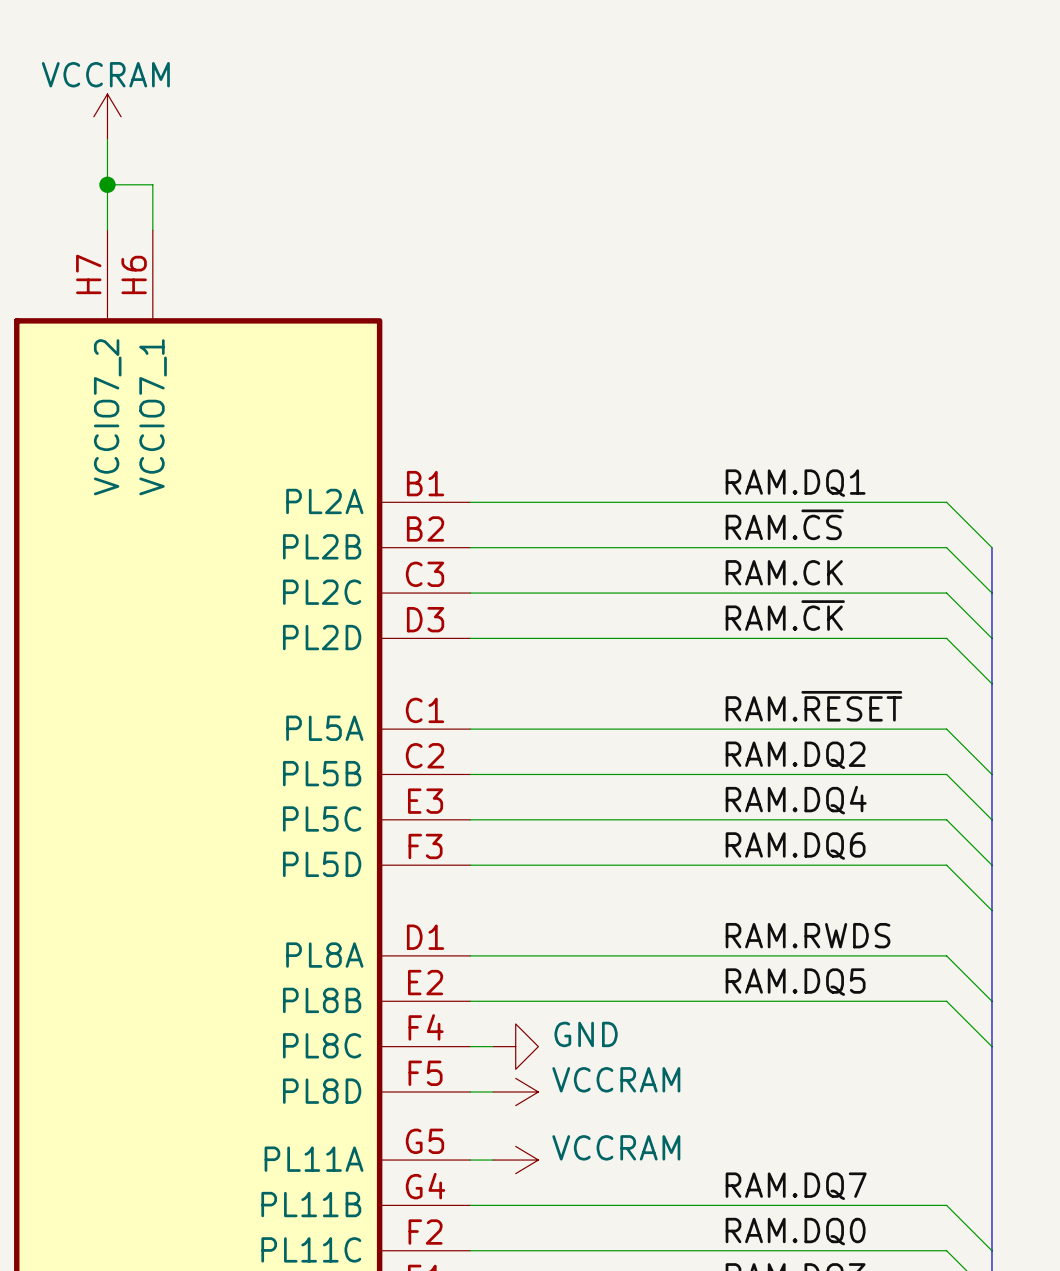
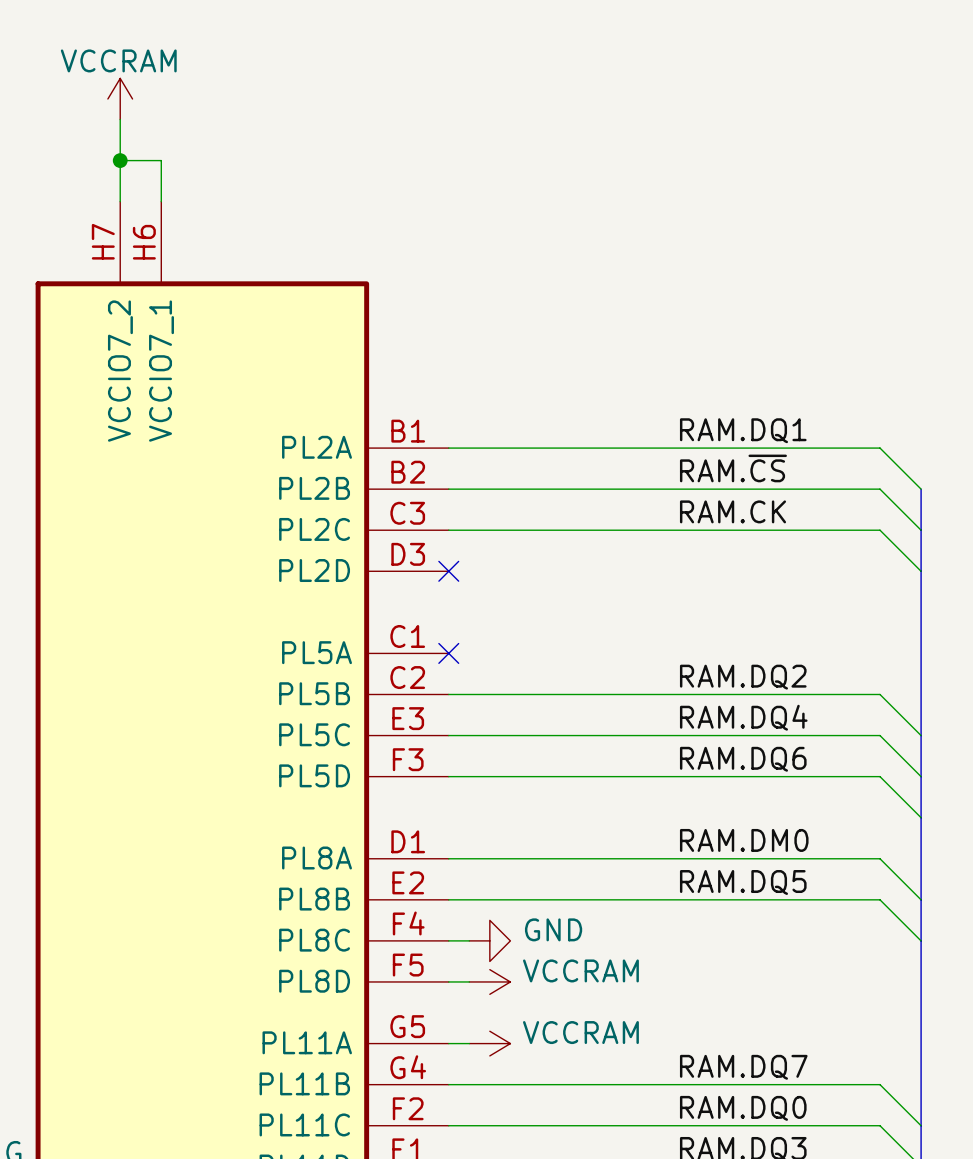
label: RAM.~{CK} (785, 615) -> none
wire: (470, 638) (946, 638) (991, 683) -> none
no-connect mark: none -> (448, 571)
label: RAM.~{RESET} (813, 706) -> none
wire: (470, 729) (946, 729) (991, 774) -> none
no-connect mark: none -> (448, 653)
label: RAM.RWDS (808, 935) -> RAM.DM0 (744, 840)

